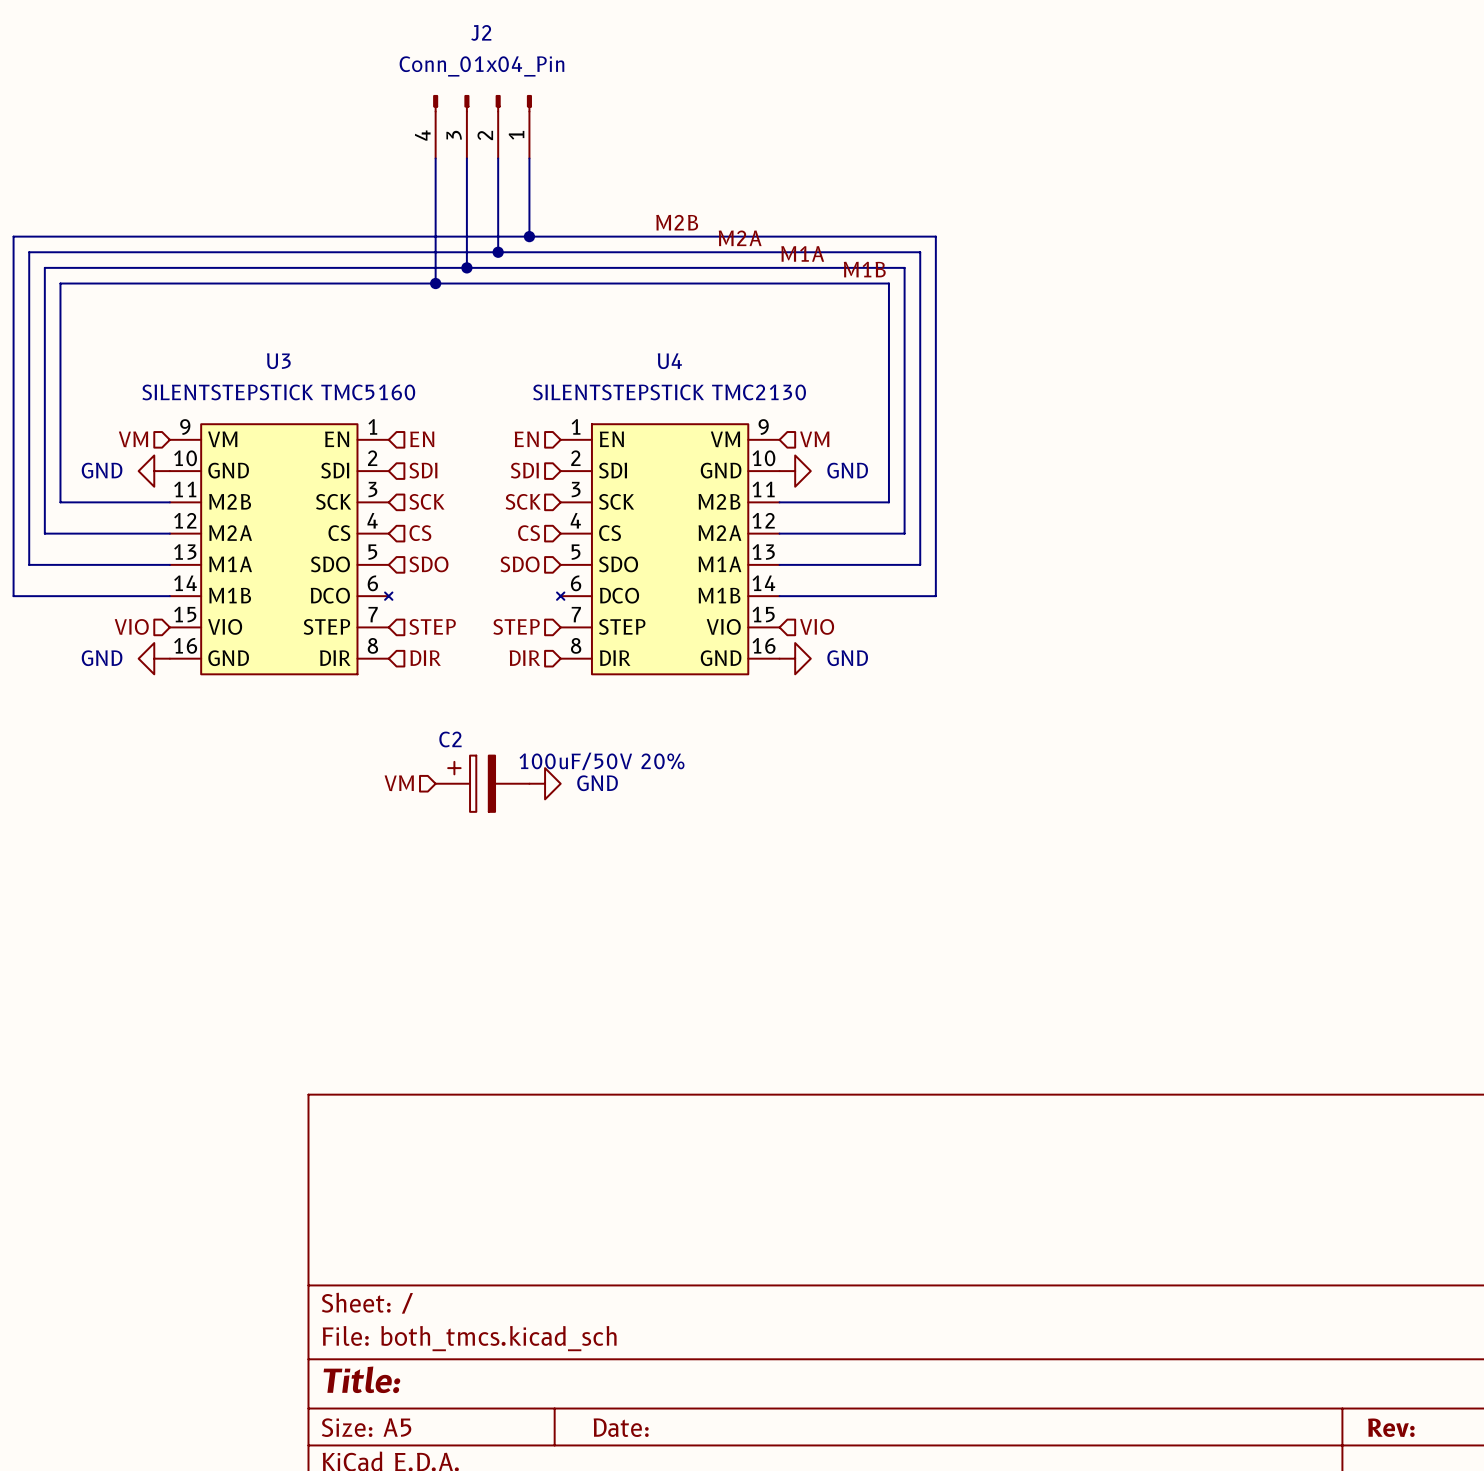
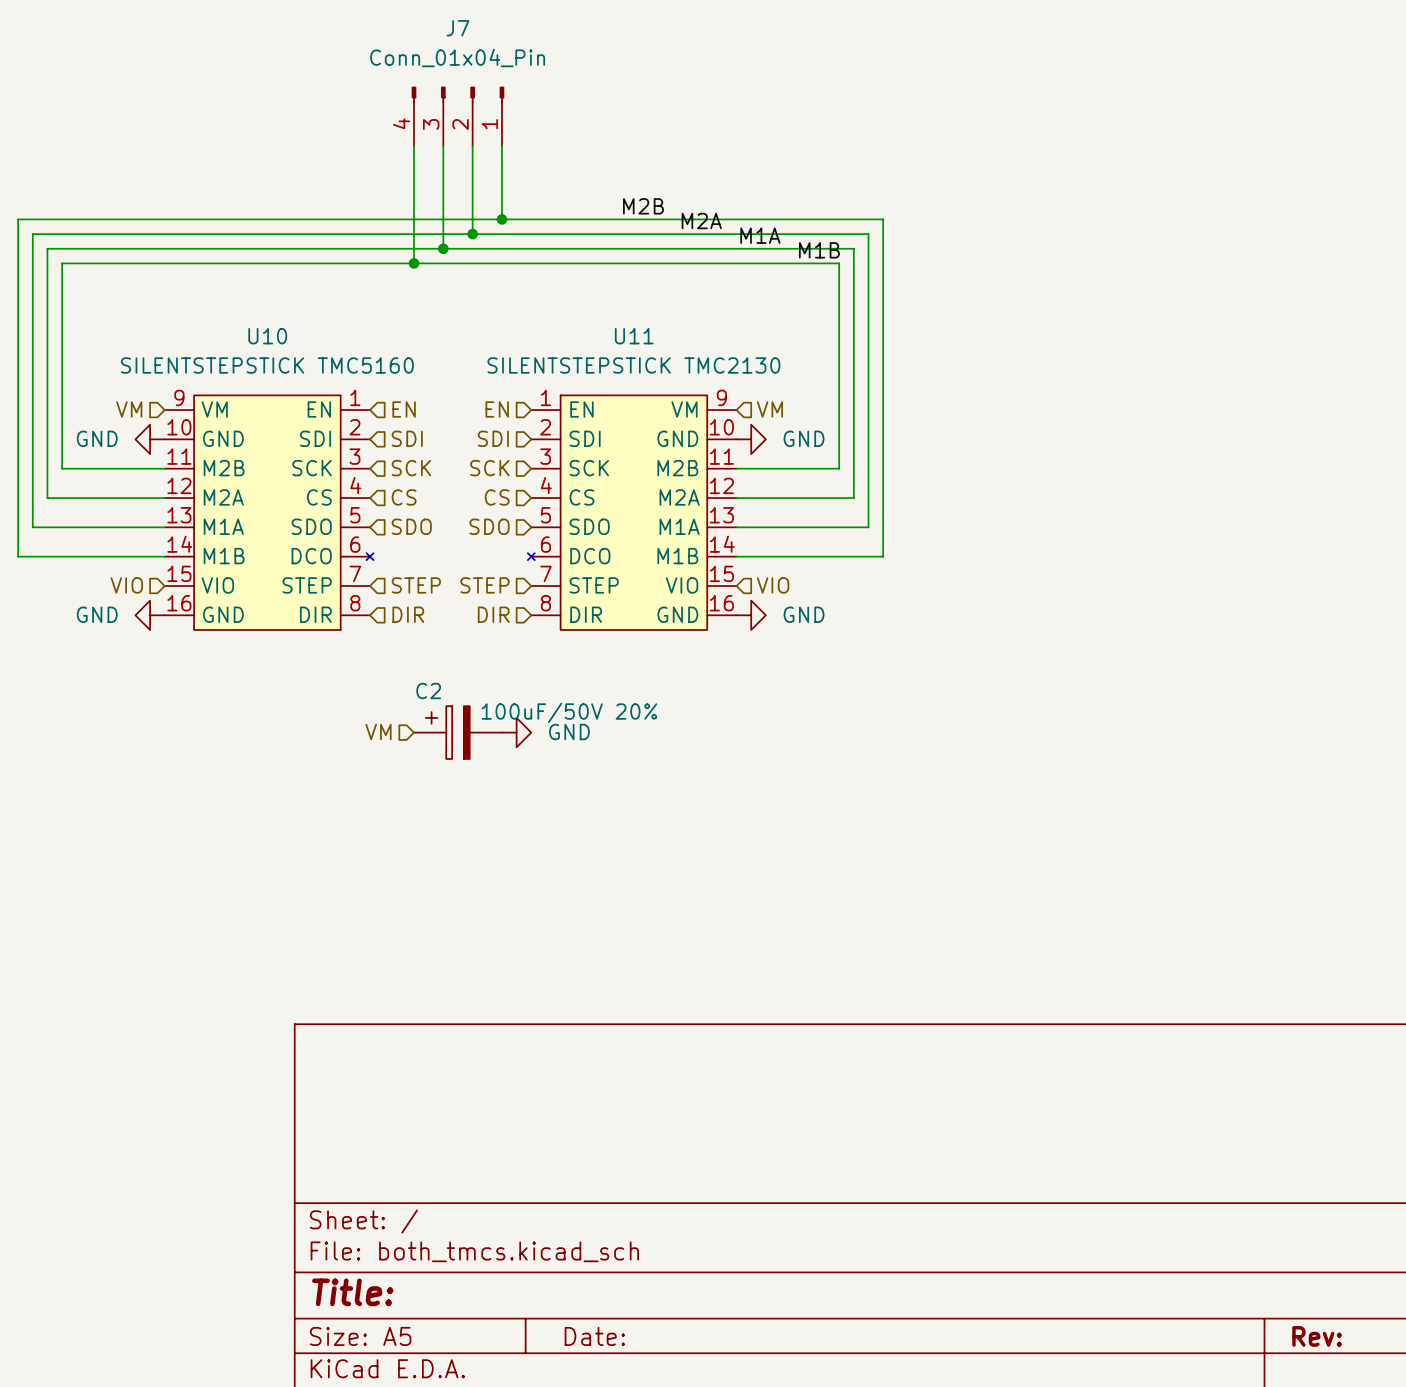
J2 name: J2 (481, 32) -> J7 (457, 28)
U3 name: U3 (278, 361) -> U10 (267, 336)
U4 name: U4 (669, 361) -> U11 (634, 336)

